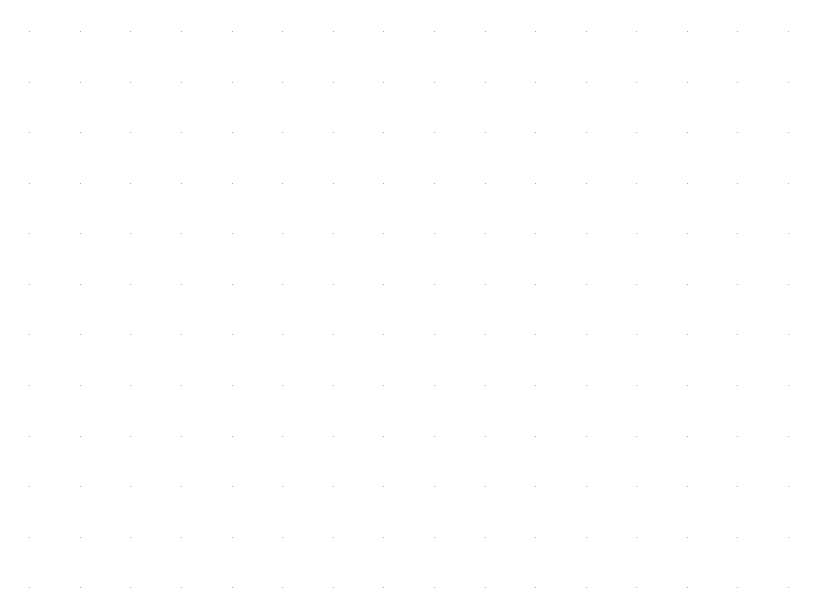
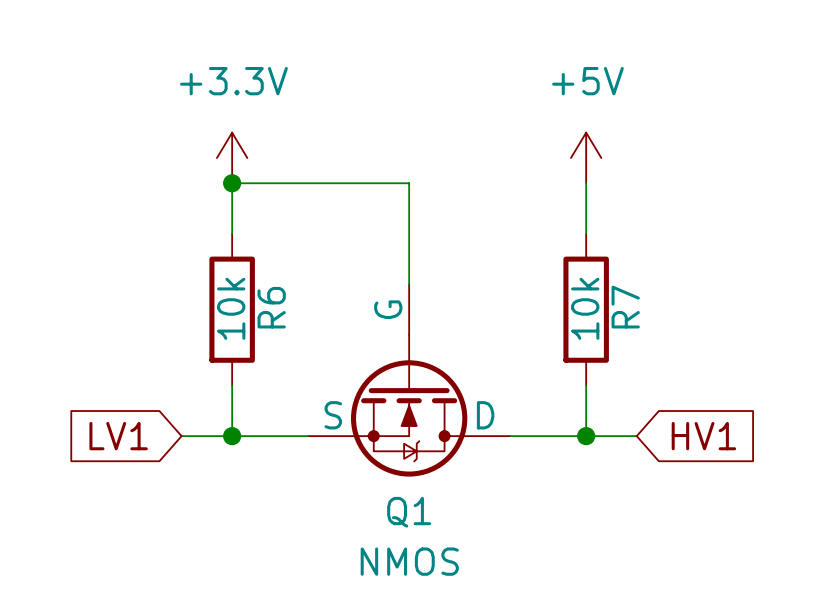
power symbol: none -> +3.3V (232, 157)
power symbol: none -> +5V (586, 157)
junction: none -> (232, 183)
wire: none -> (586, 183) (586, 233)
wire: none -> (232, 233) (232, 183) (409, 183) (409, 284)
R6: none -> 10k (232, 309)
R7: none -> 10k (586, 309)
Q1: none -> NMOS (409, 380)
wire: none -> (232, 385) (232, 436)
wire: none -> (586, 385) (586, 436)
global label: none -> LV1 (118, 436)
wire: none -> (181, 436) (308, 436)
junction: none -> (232, 436)
wire: none -> (510, 436) (636, 436)
junction: none -> (586, 436)
global label: none -> HV1 (703, 436)

